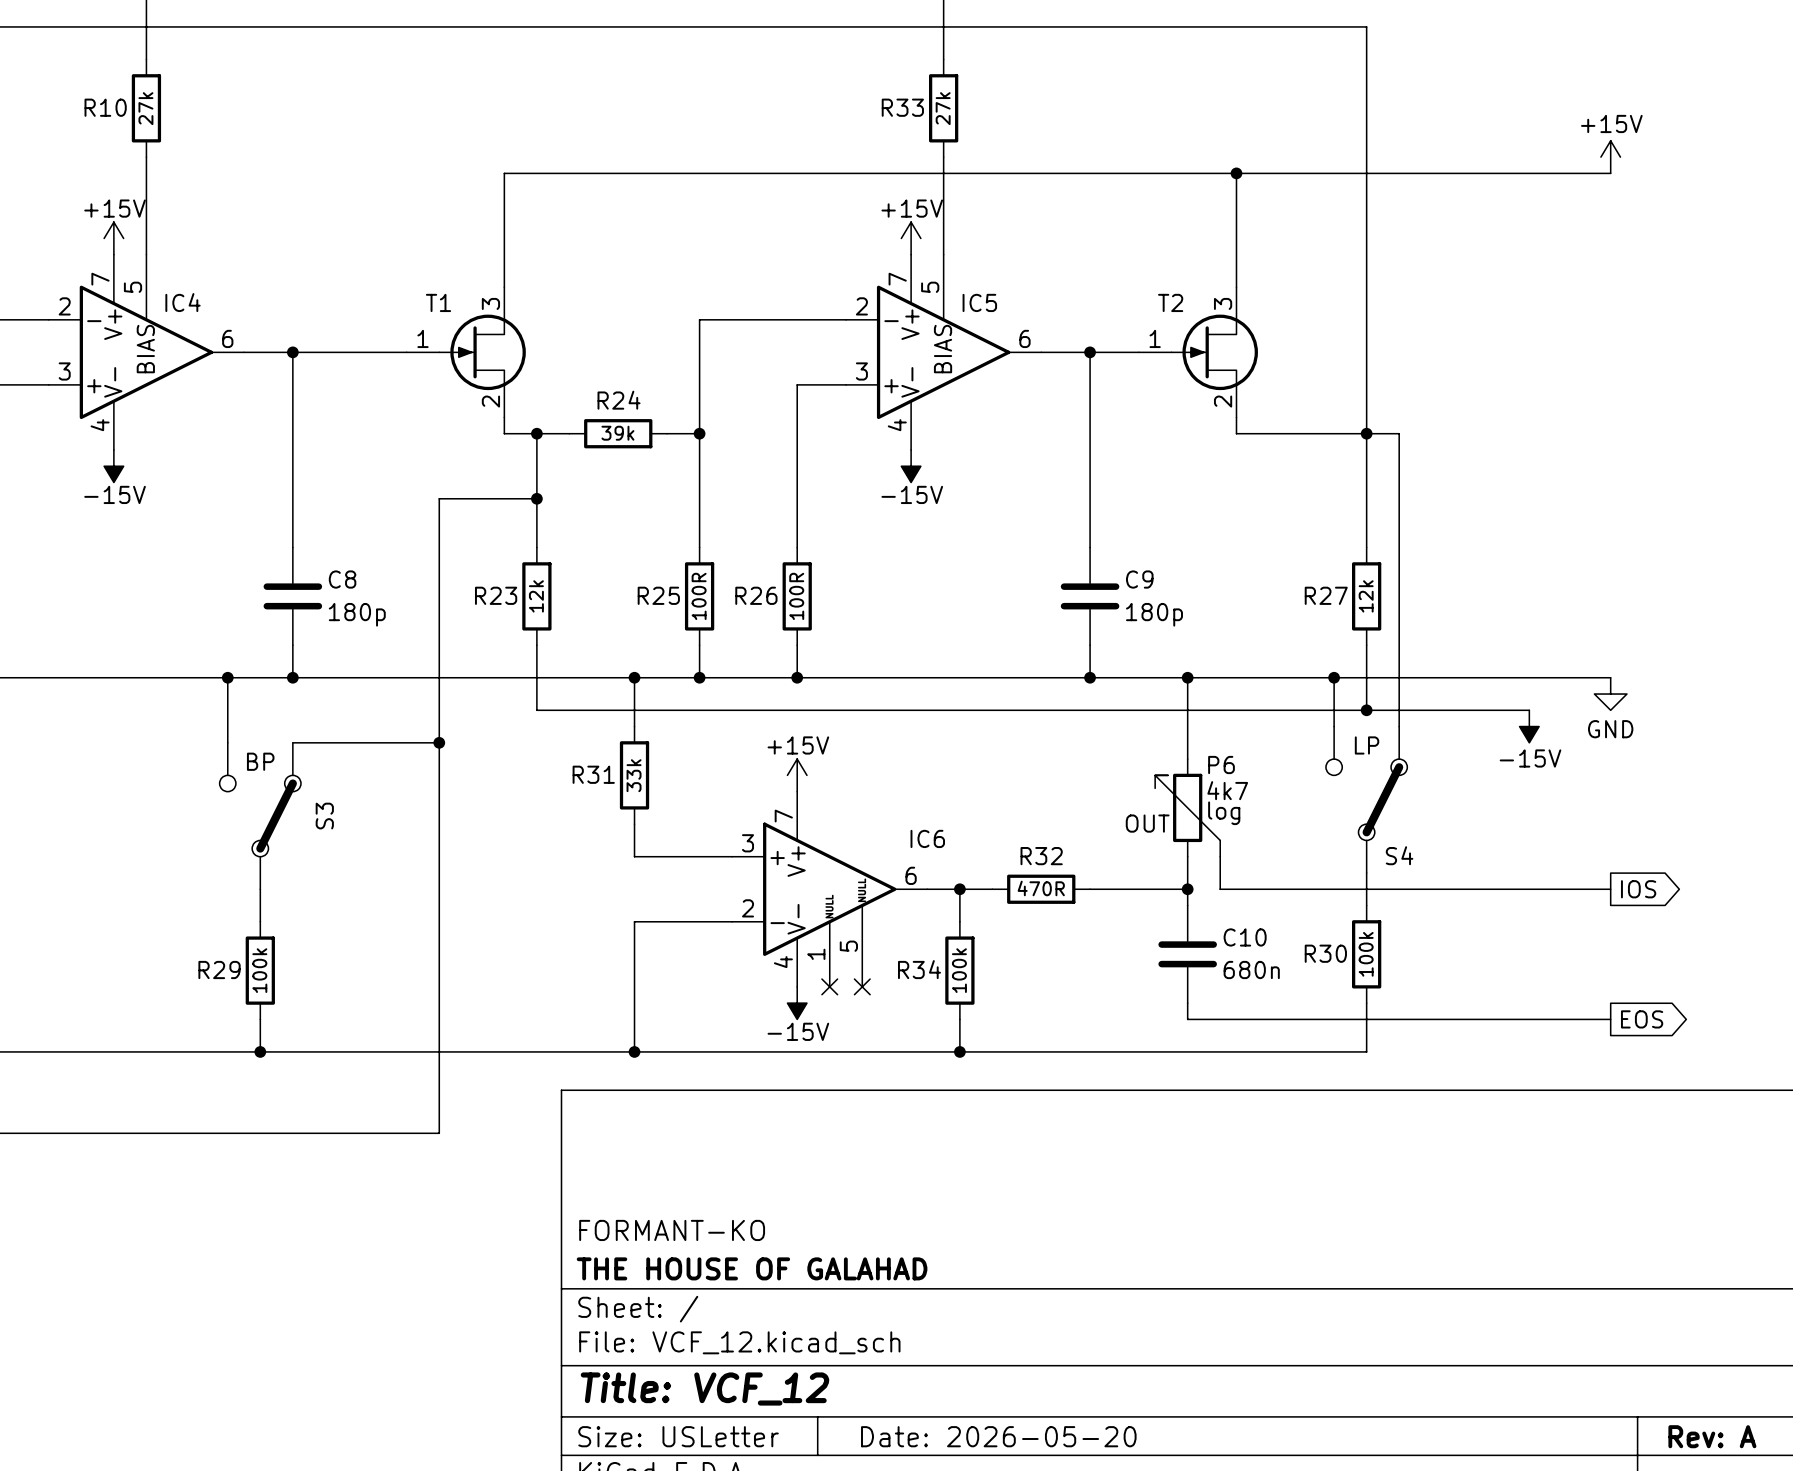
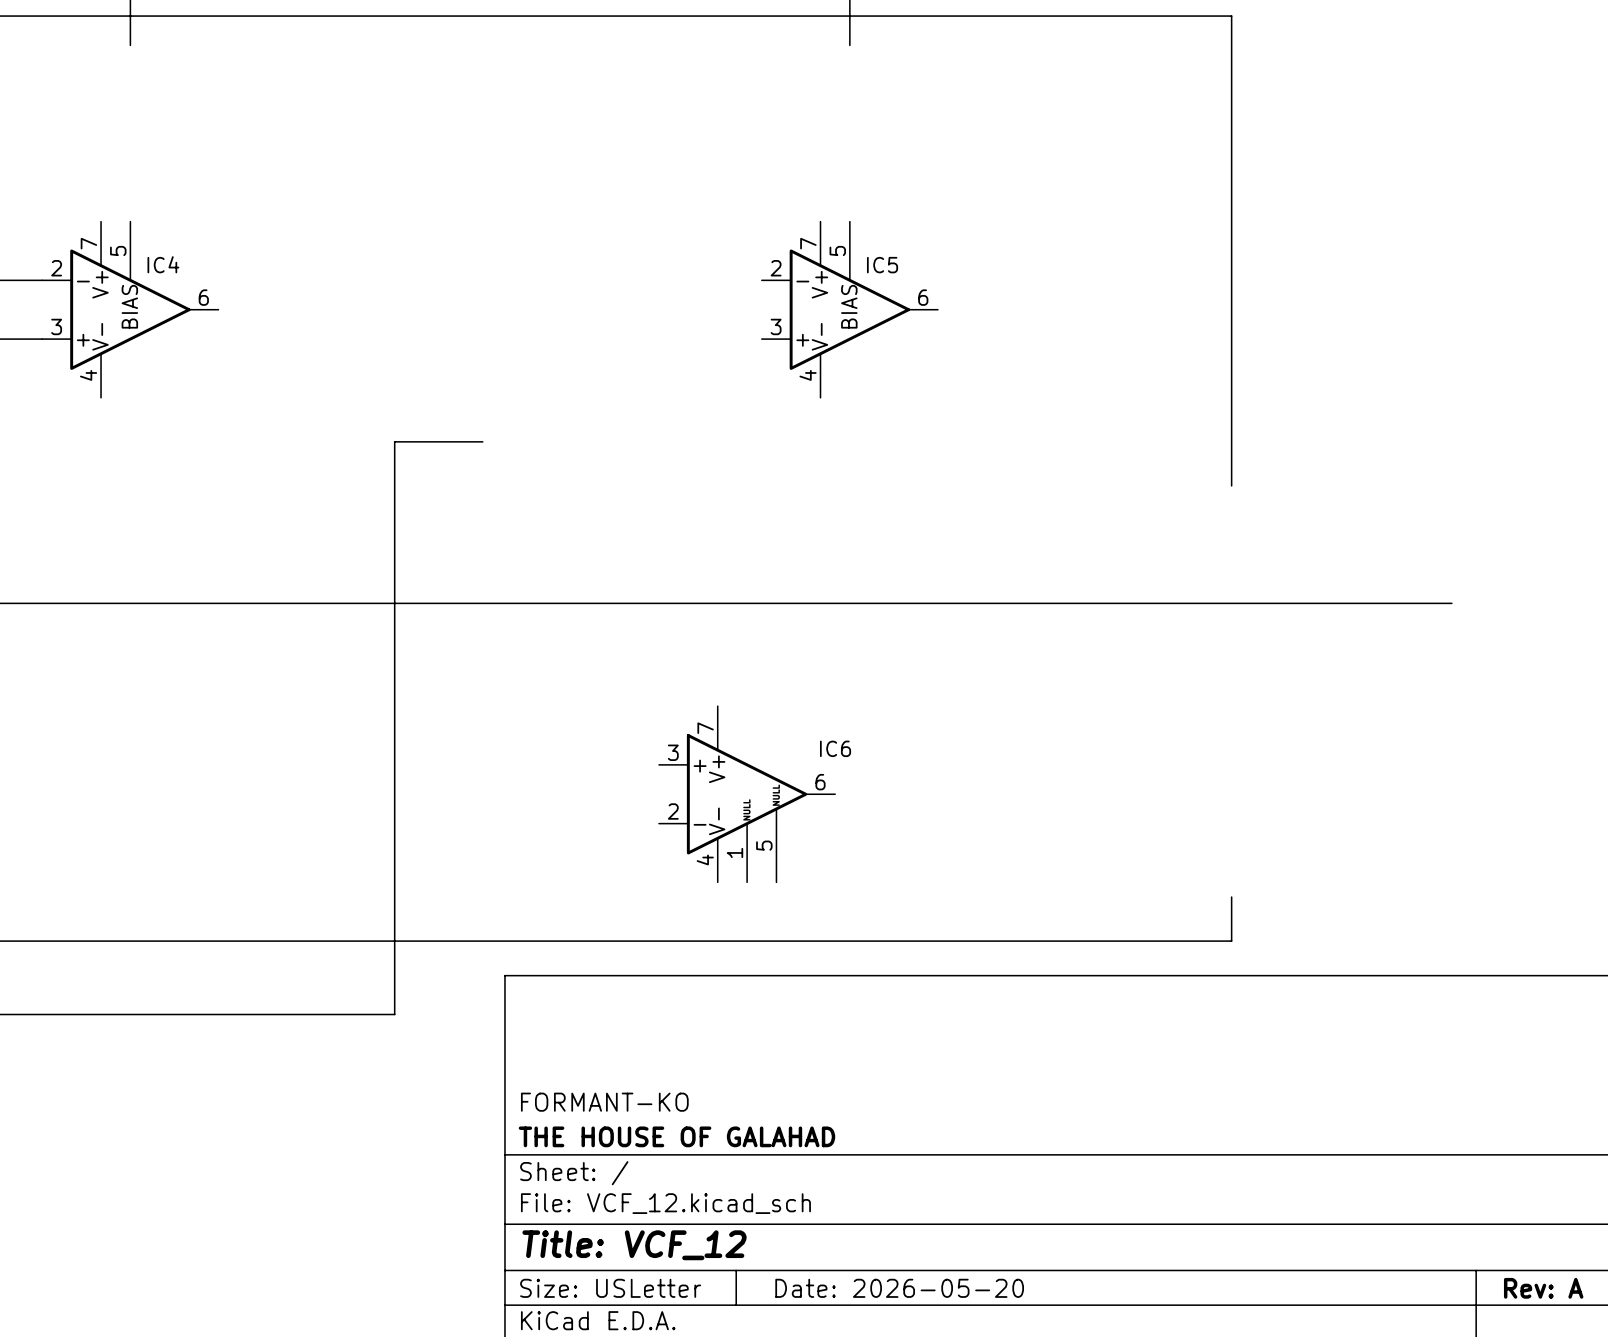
R10: 27k (146, 108) -> none
R33: 27k (943, 108) -> none
wire: (146, 157) (146, 254) -> none
wire: (943, 157) (943, 254) -> none
power symbol: +15V (1610, 157) -> none
wire: (1236, 173) (1236, 287) -> none
junction: (1236, 173) -> none
wire: (1610, 173) (504, 173) (504, 287) -> none
power symbol: +15V (113, 238) -> none
power symbol: +15V (911, 238) -> none
wire: (846, 319) (699, 319) (699, 547) -> none
wire: (244, 352) (406, 352) -> none
wire: (292, 352) (292, 547) -> none
junction: (292, 352) -> none
T1: (466, 352) -> none
wire: (1041, 352) (1138, 352) -> none
wire: (1090, 352) (1090, 547) -> none
junction: (1090, 352) -> none
T2: (1198, 352) -> none
wire: (846, 384) (797, 384) (797, 547) -> none
wire: (504, 417) (504, 433) (569, 433) -> none
wire: (1236, 417) (1236, 433) (1399, 433) (1399, 726) -> none
wire: (536, 433) (536, 547) -> none
junction: (536, 433) -> none
R24: 39k (618, 433) -> none
wire: (667, 433) (699, 433) -> none
junction: (699, 433) -> none
junction: (1366, 433) -> none
power symbol: -15V (113, 466) -> none
power symbol: -15V (911, 466) -> none
junction: (536, 498) -> none
C8: 180p (292, 596) -> none
R23: 12k (536, 596) -> none
R25: 100R (699, 596) -> none
R26: 100R (797, 596) -> none
C9: 180p (1090, 596) -> none
R27: 12k (1366, 596) -> none
wire: (292, 645) (292, 677) -> none
wire: (536, 645) (536, 710) (1529, 710) -> none
wire: (699, 645) (699, 677) -> none
wire: (797, 645) (797, 677) -> none
wire: (1090, 645) (1090, 677) -> none
wire: (1366, 645) (1366, 710) -> none
wire: (227, 677) (227, 742) -> none
junction: (227, 677) -> none
junction: (292, 677) -> none
wire: (634, 677) (634, 726) -> none
junction: (634, 677) -> none
junction: (699, 677) -> none
junction: (797, 677) -> none
junction: (1090, 677) -> none
wire: (1187, 677) (1187, 759) -> none
junction: (1187, 677) -> none
wire: (1334, 677) (1334, 726) -> none
junction: (1334, 677) -> none
power symbol: GND (1610, 694) -> none
junction: (1366, 710) -> none
power symbol: -15V (1529, 726) -> none
wire: (292, 742) (439, 742) -> none
junction: (439, 742) -> none
R31: 33k (634, 775) -> none
power symbol: +15V (797, 775) -> none
S4: LP (1366, 799) -> none
P6: 4k7 (1187, 807) -> none
S3: BP (260, 816) -> none
wire: (634, 824) (634, 856) (732, 856) -> none
wire: (1187, 856) (1187, 905) -> none
wire: (1220, 856) (1220, 889) (1610, 889) -> none
wire: (1366, 872) (1366, 905) -> none
wire: (260, 889) (260, 921) -> none
wire: (927, 889) (992, 889) -> none
wire: (959, 889) (959, 921) -> none
junction: (959, 889) -> none
R32: 470R (1041, 889) -> none
wire: (1090, 889) (1187, 889) -> none
junction: (1187, 889) -> none
global label: IOS (1638, 889) -> none
wire: (732, 921) (634, 921) (634, 1051) -> none
C10: 680n (1187, 954) -> none
R30: 100k (1366, 954) -> none
R29: 100k (260, 970) -> none
R34: 100k (959, 970) -> none
no-connect mark: (829, 986) -> none
no-connect mark: (862, 986) -> none
power symbol: -15V (797, 1003) -> none
wire: (1187, 1003) (1187, 1019) (1610, 1019) -> none
wire: (260, 1019) (260, 1051) -> none
wire: (959, 1019) (959, 1051) -> none
global label: EOS (1642, 1019) -> none
junction: (260, 1051) -> none
junction: (634, 1051) -> none
junction: (959, 1051) -> none

